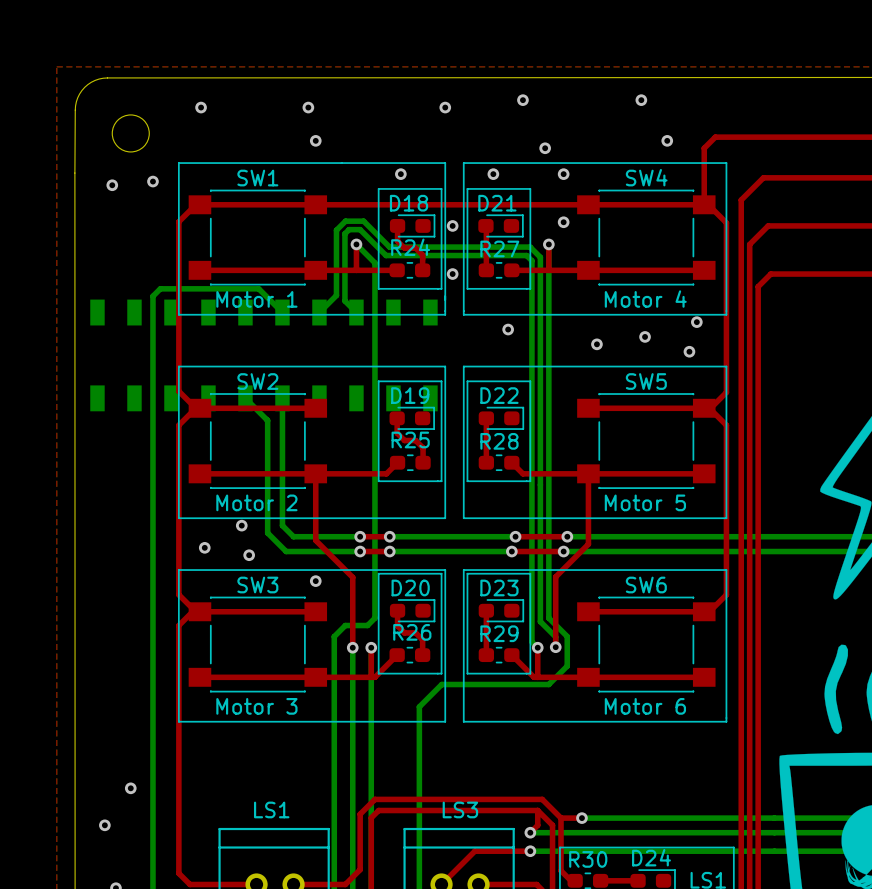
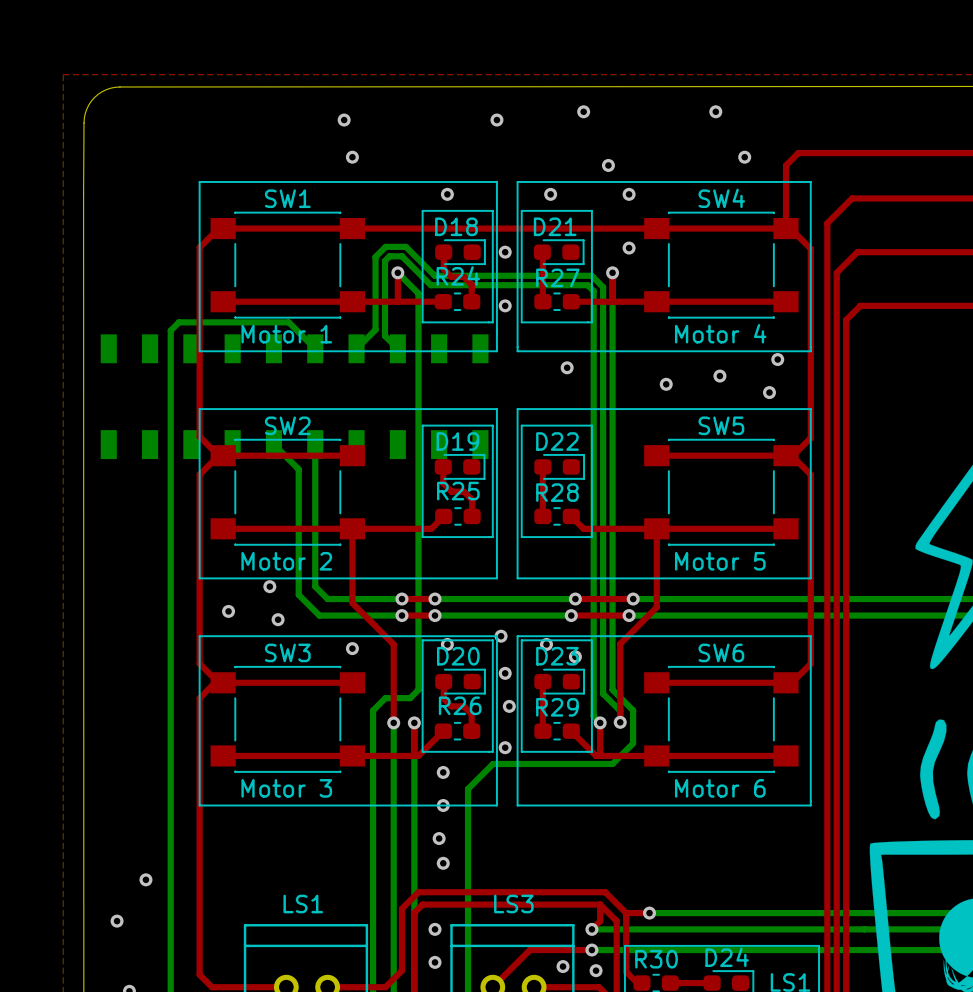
via: (201, 107) -> none
round board edge: [111, 114, 150, 153] -> none
via: (152, 181) -> none
via: (112, 185) -> none
via: none -> (501, 636)
via: none -> (447, 644)
via: none -> (546, 644)
via: none -> (575, 656)
via: none -> (505, 673)
via: none -> (509, 706)
via: none -> (505, 747)
via: none -> (443, 772)
via: none -> (443, 805)
via: none -> (439, 838)
via: none -> (443, 863)
via: none -> (435, 929)
via: none -> (435, 962)
via: none -> (563, 966)
via: none -> (596, 970)

